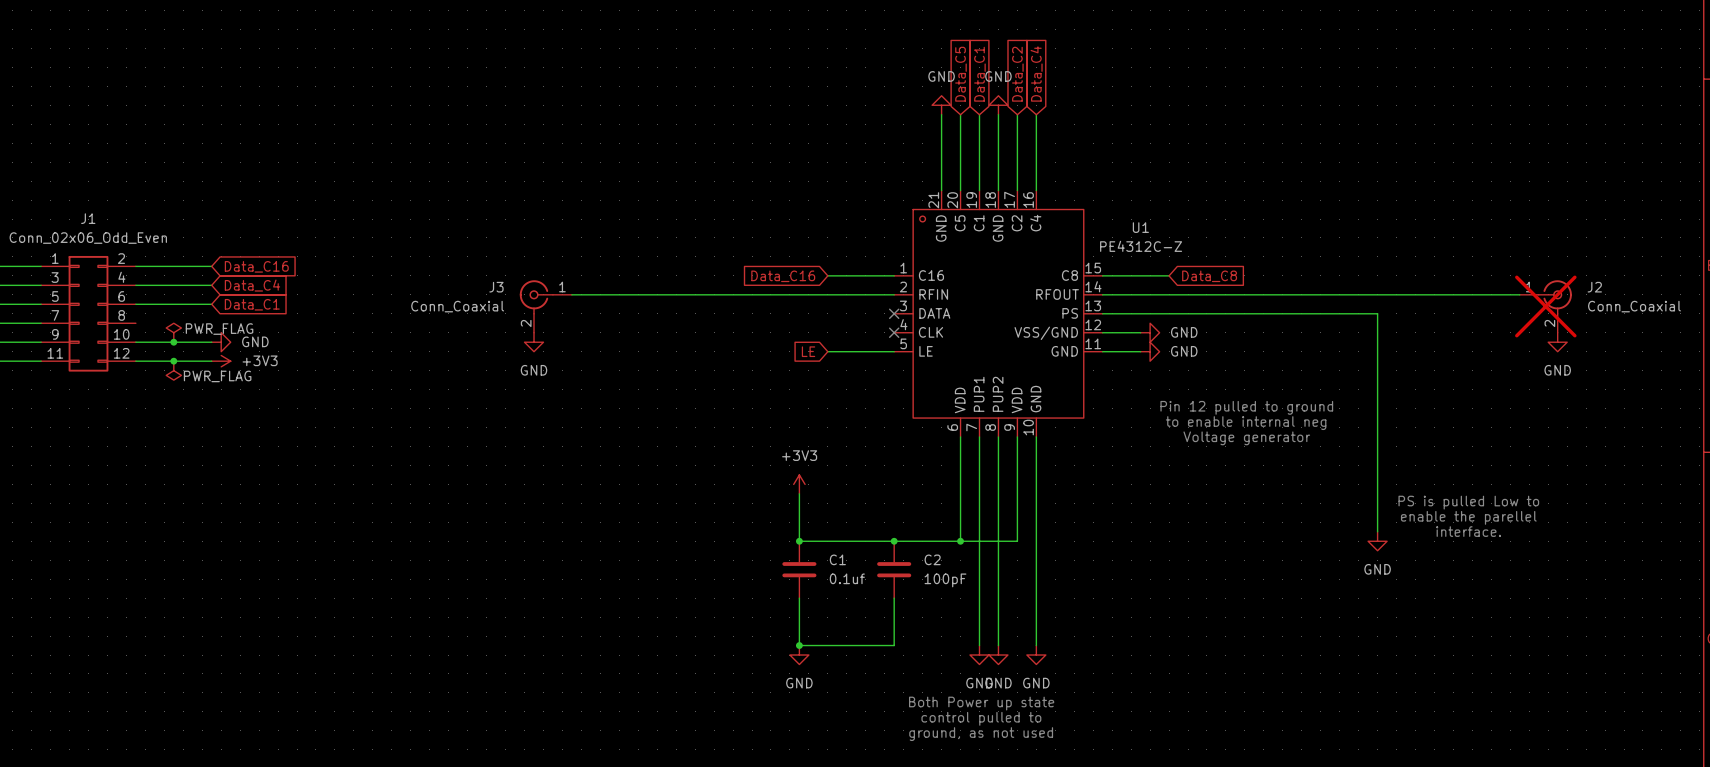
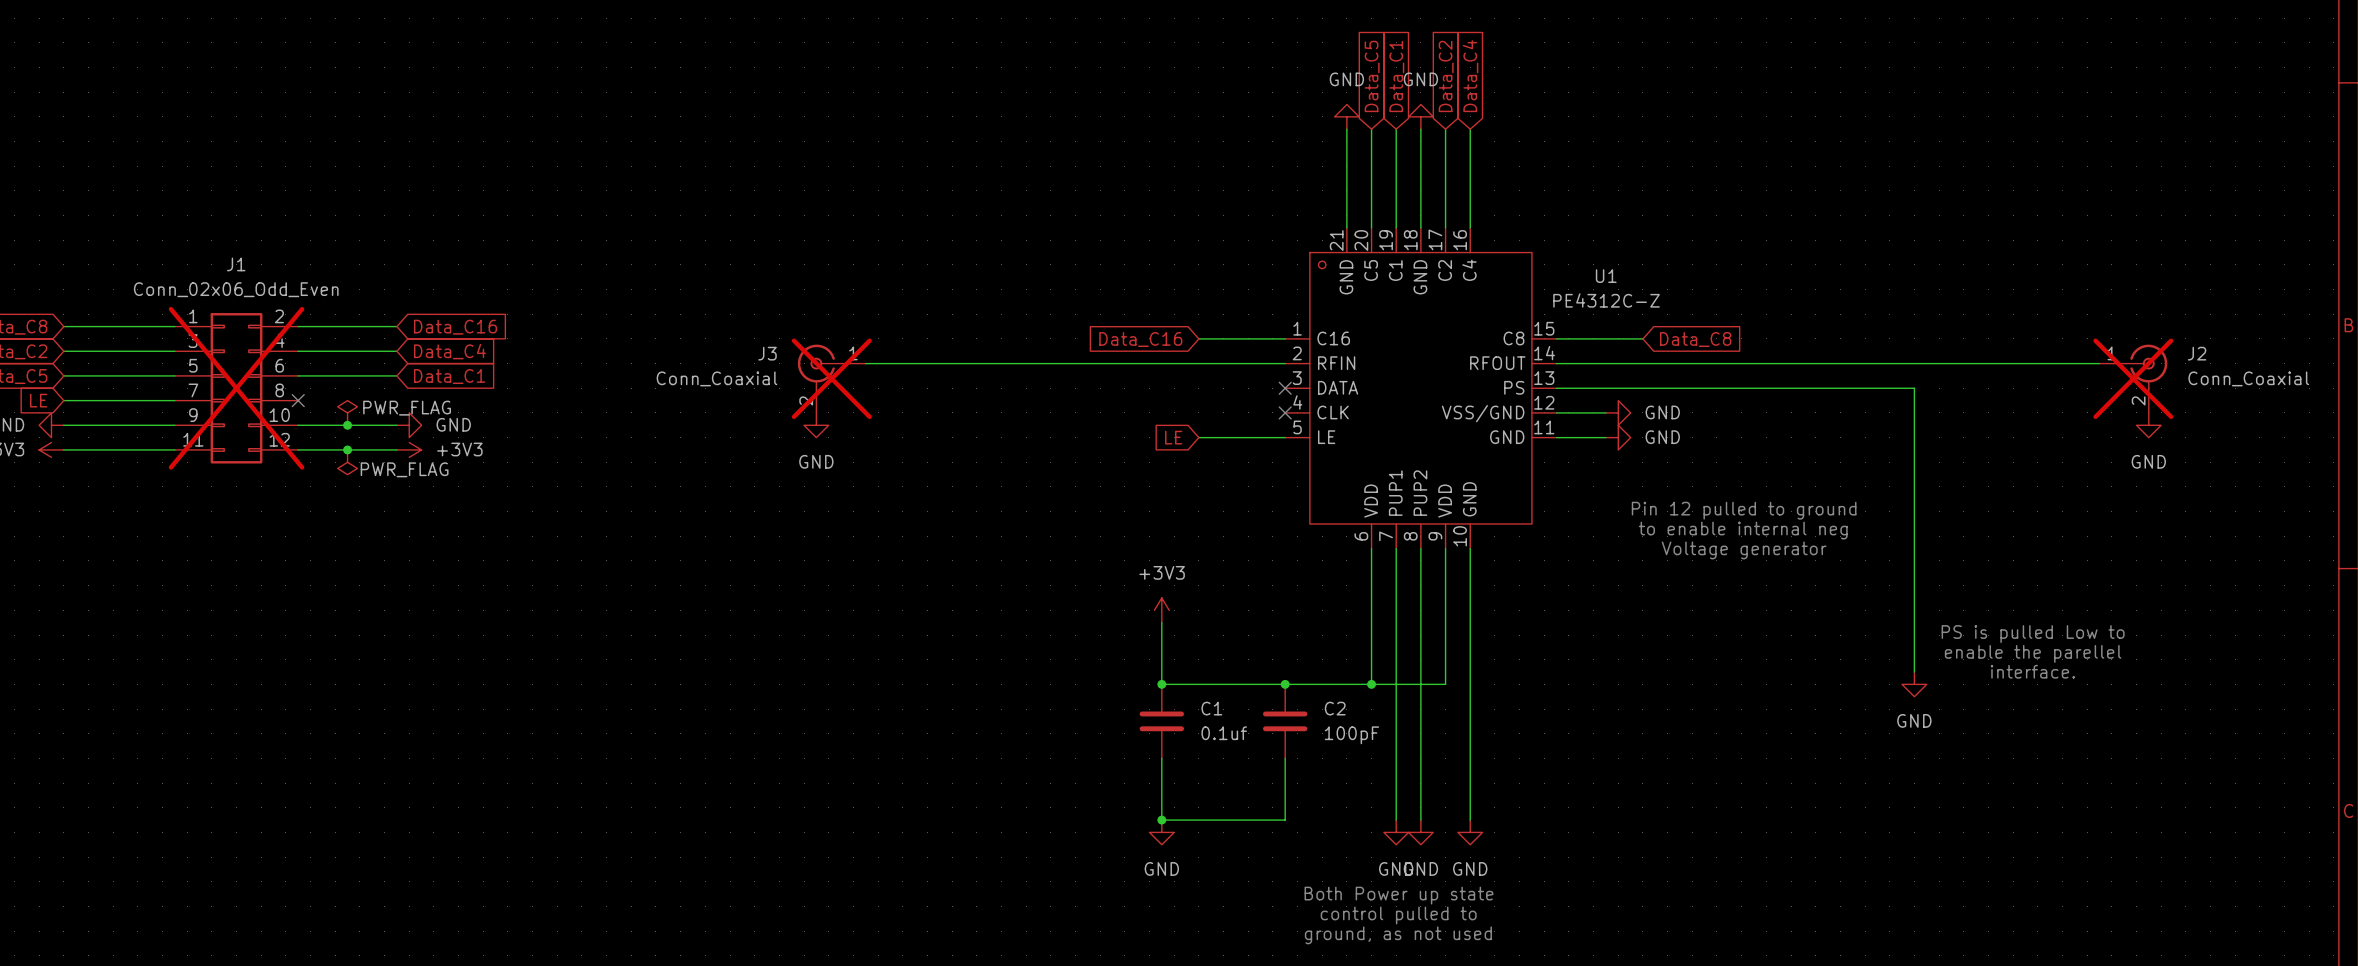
J3 do-not-place cross: none -> (831, 378)
J1 do-not-place cross: none -> (236, 388)
no-connect mark: none -> (298, 400)

